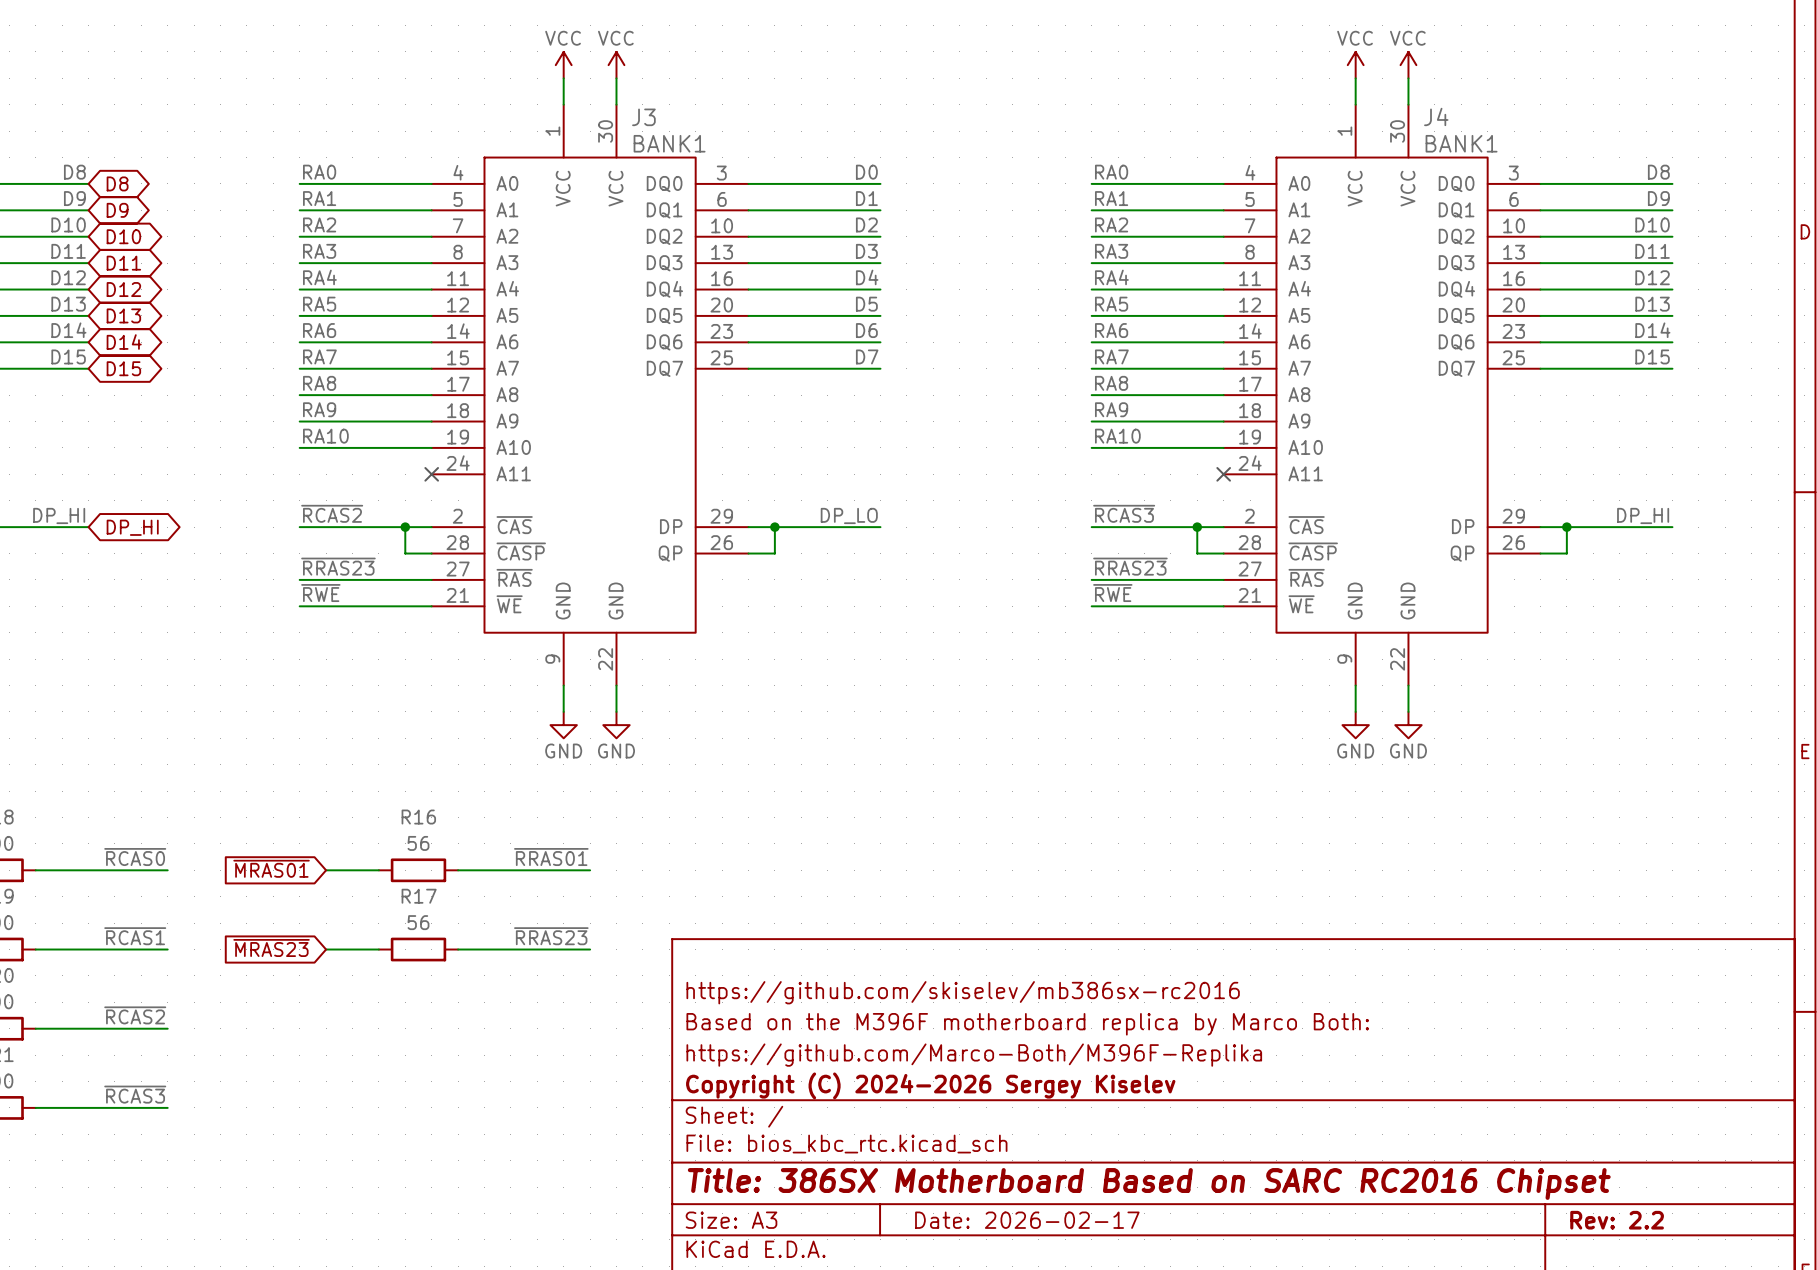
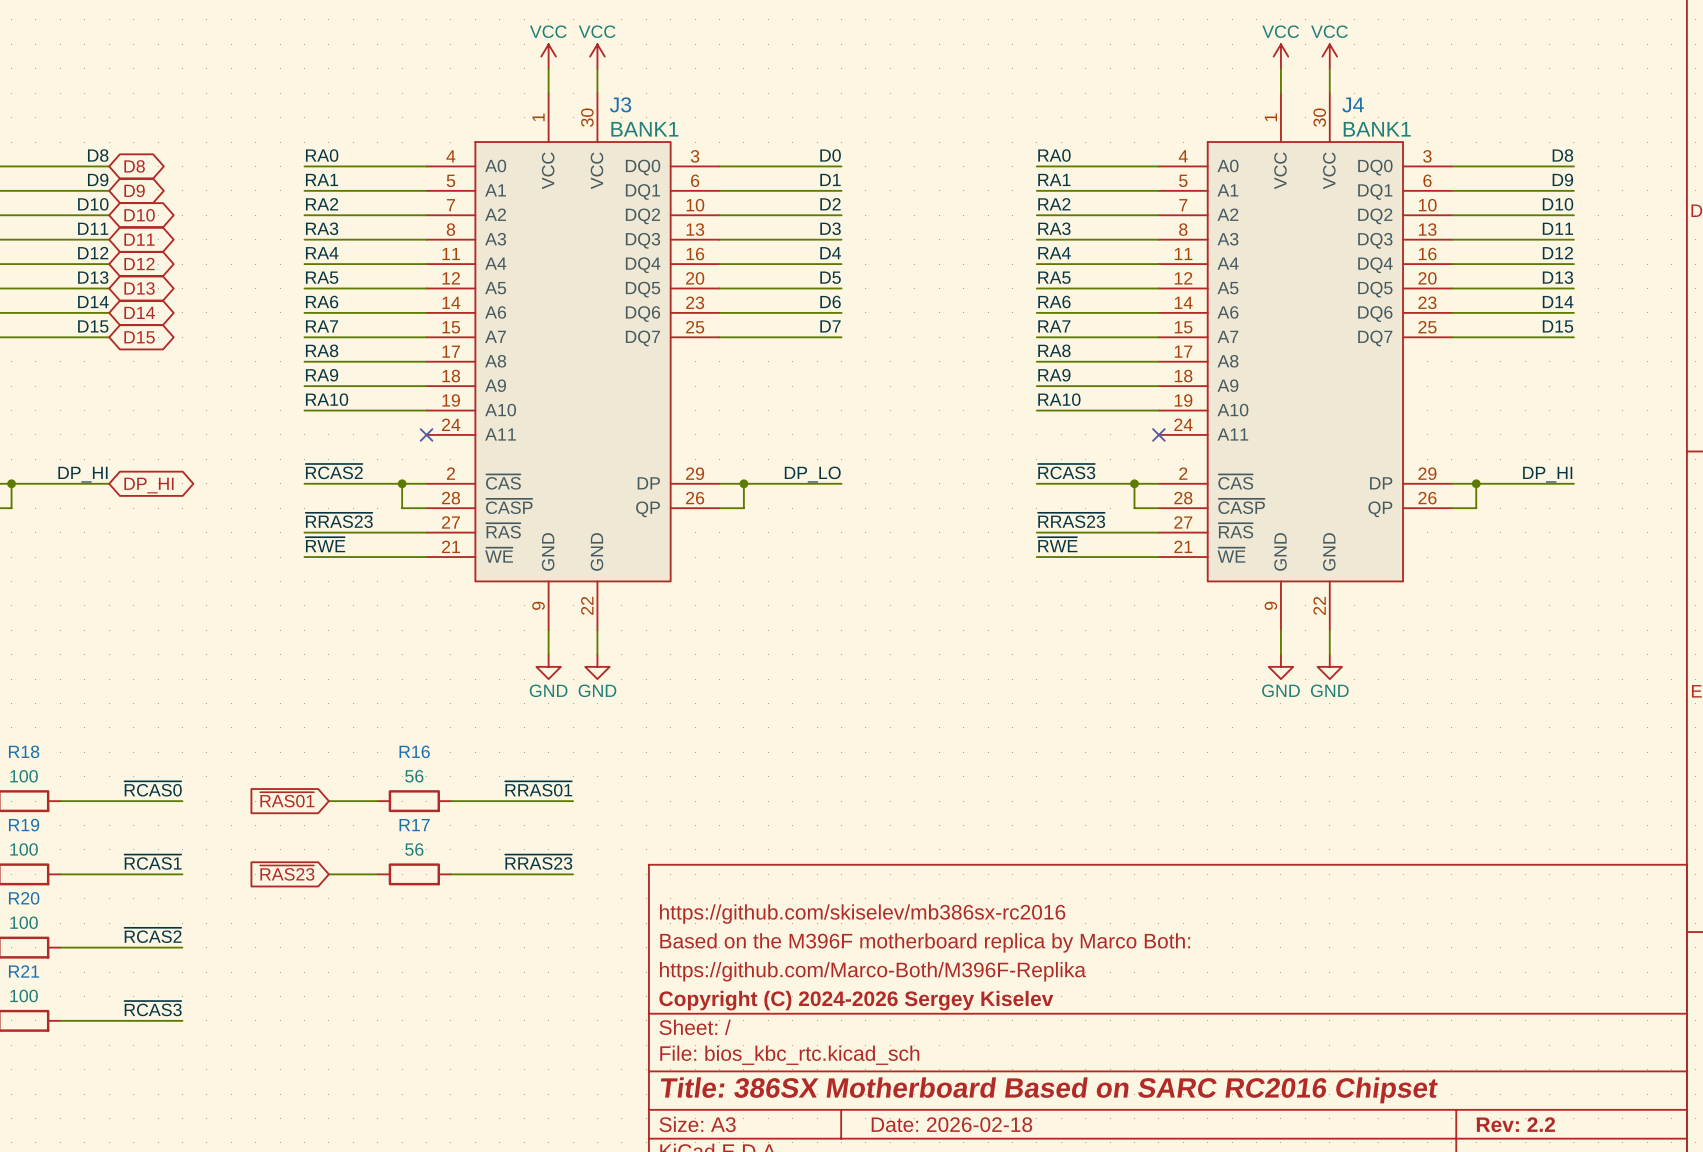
global label: ~{MRAS01} (271, 868) -> ~{RAS01} (287, 799)
global label: ~{MRAS23} (271, 947) -> ~{RAS23} (287, 873)
title block: Date: 2026-02-17 (1027, 1220) -> Date: 2026-02-18 (951, 1124)

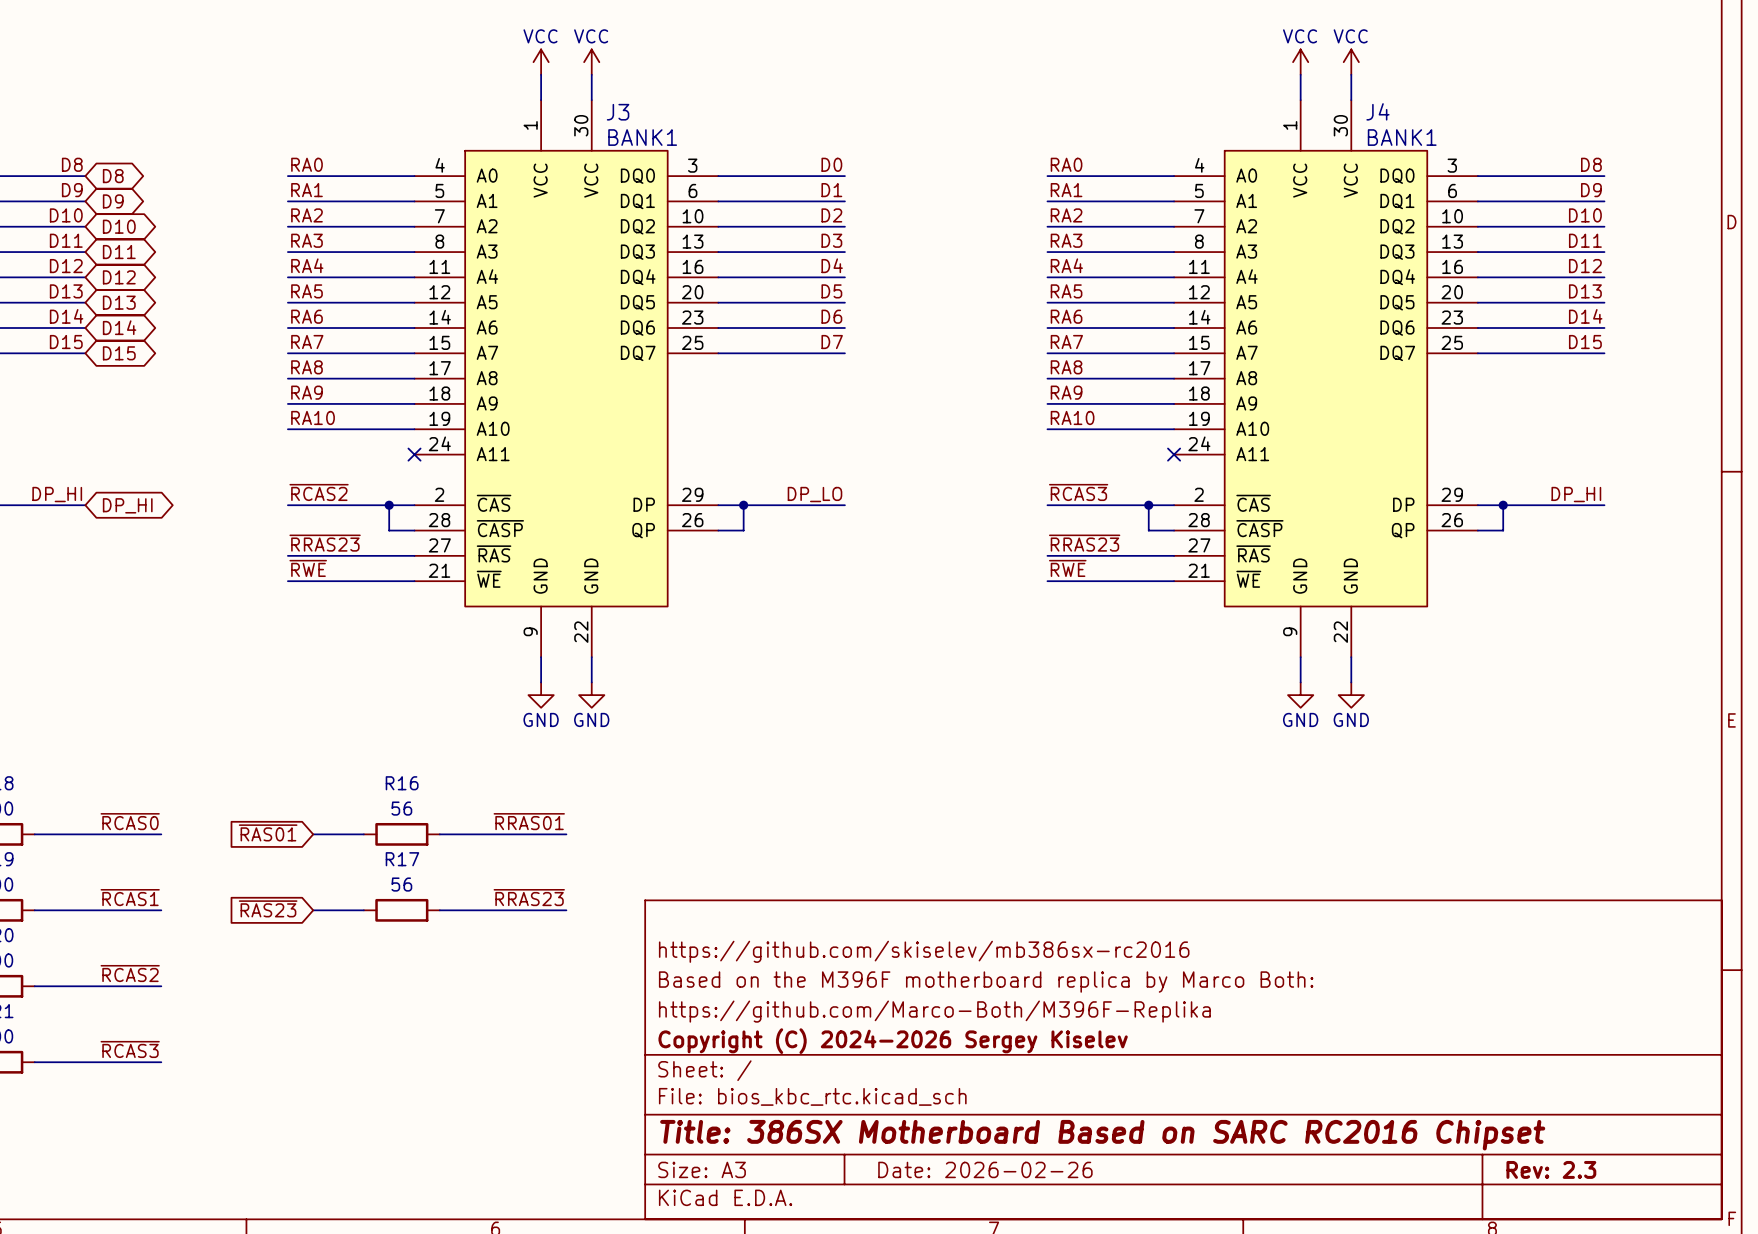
title block: Date: 2026-02-18 (951, 1124) -> Date: 2026-02-26 (985, 1169)
title block: Rev: 2.2 (1515, 1124) -> Rev: 2.3 (1551, 1169)

